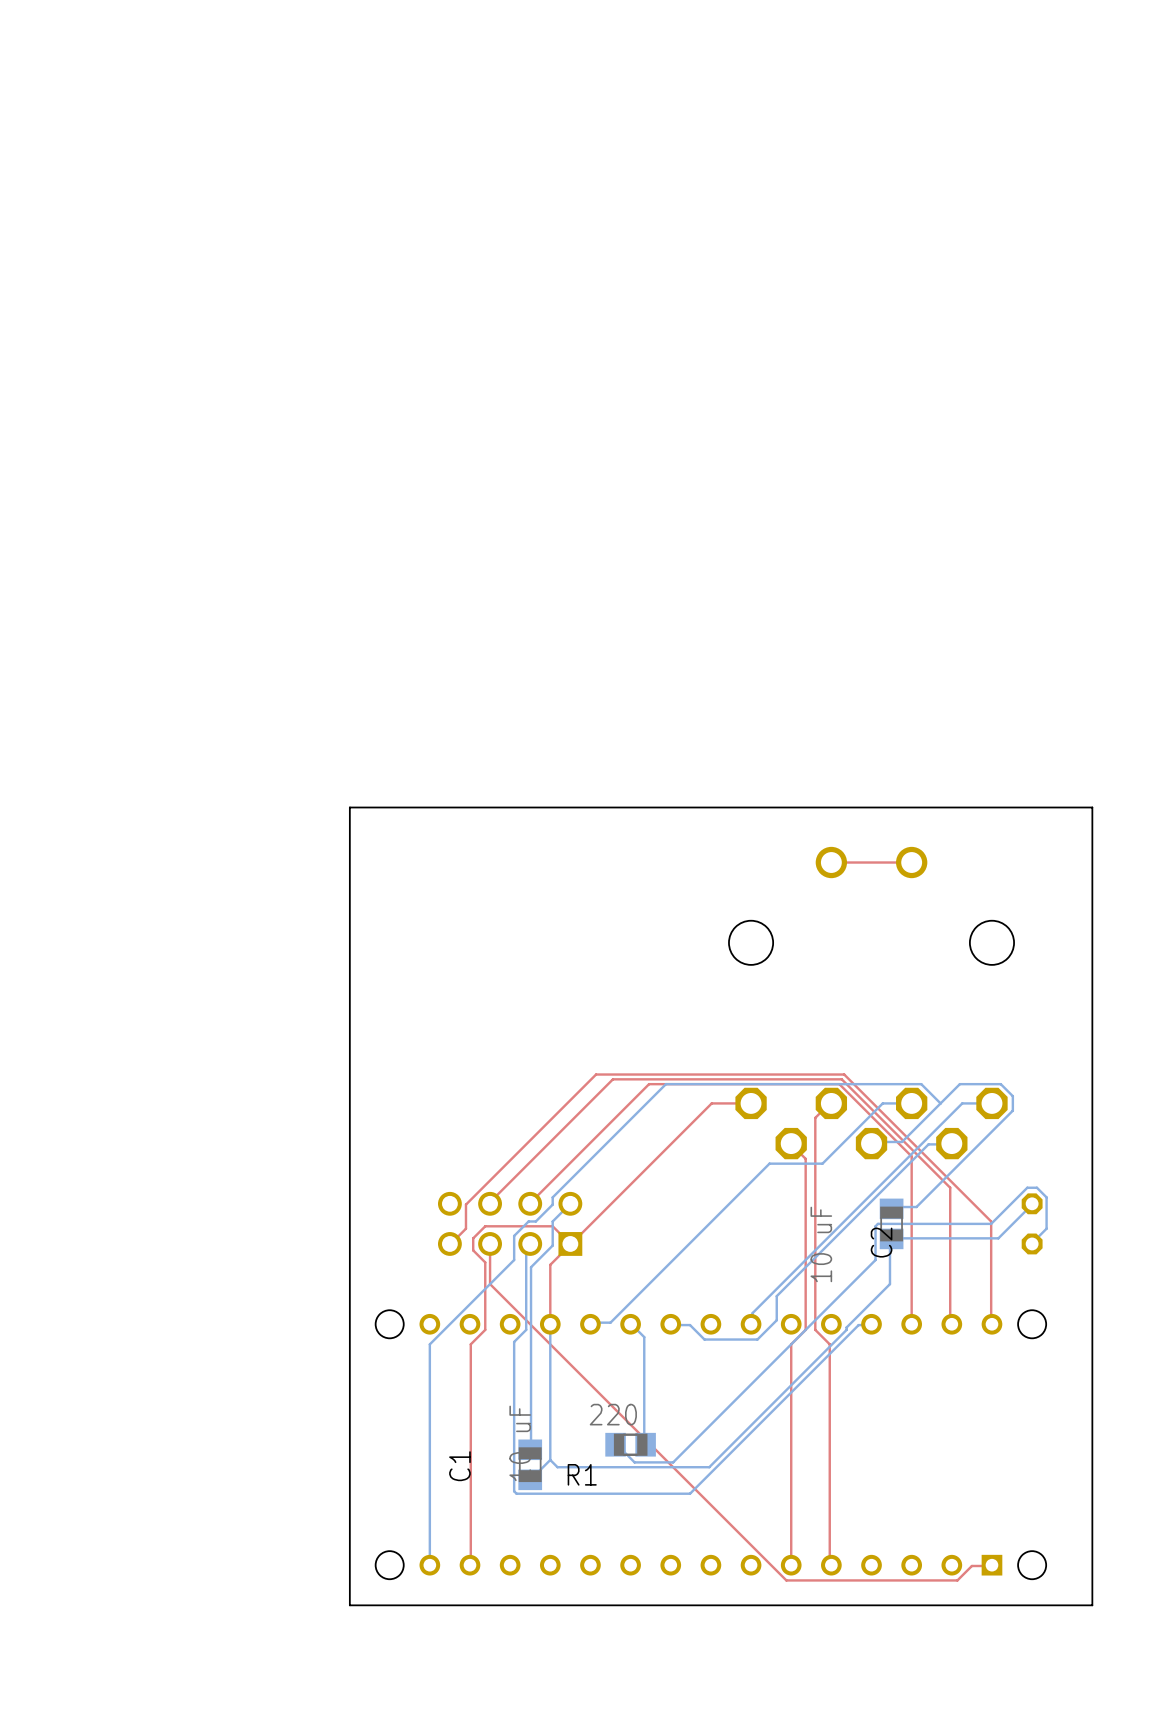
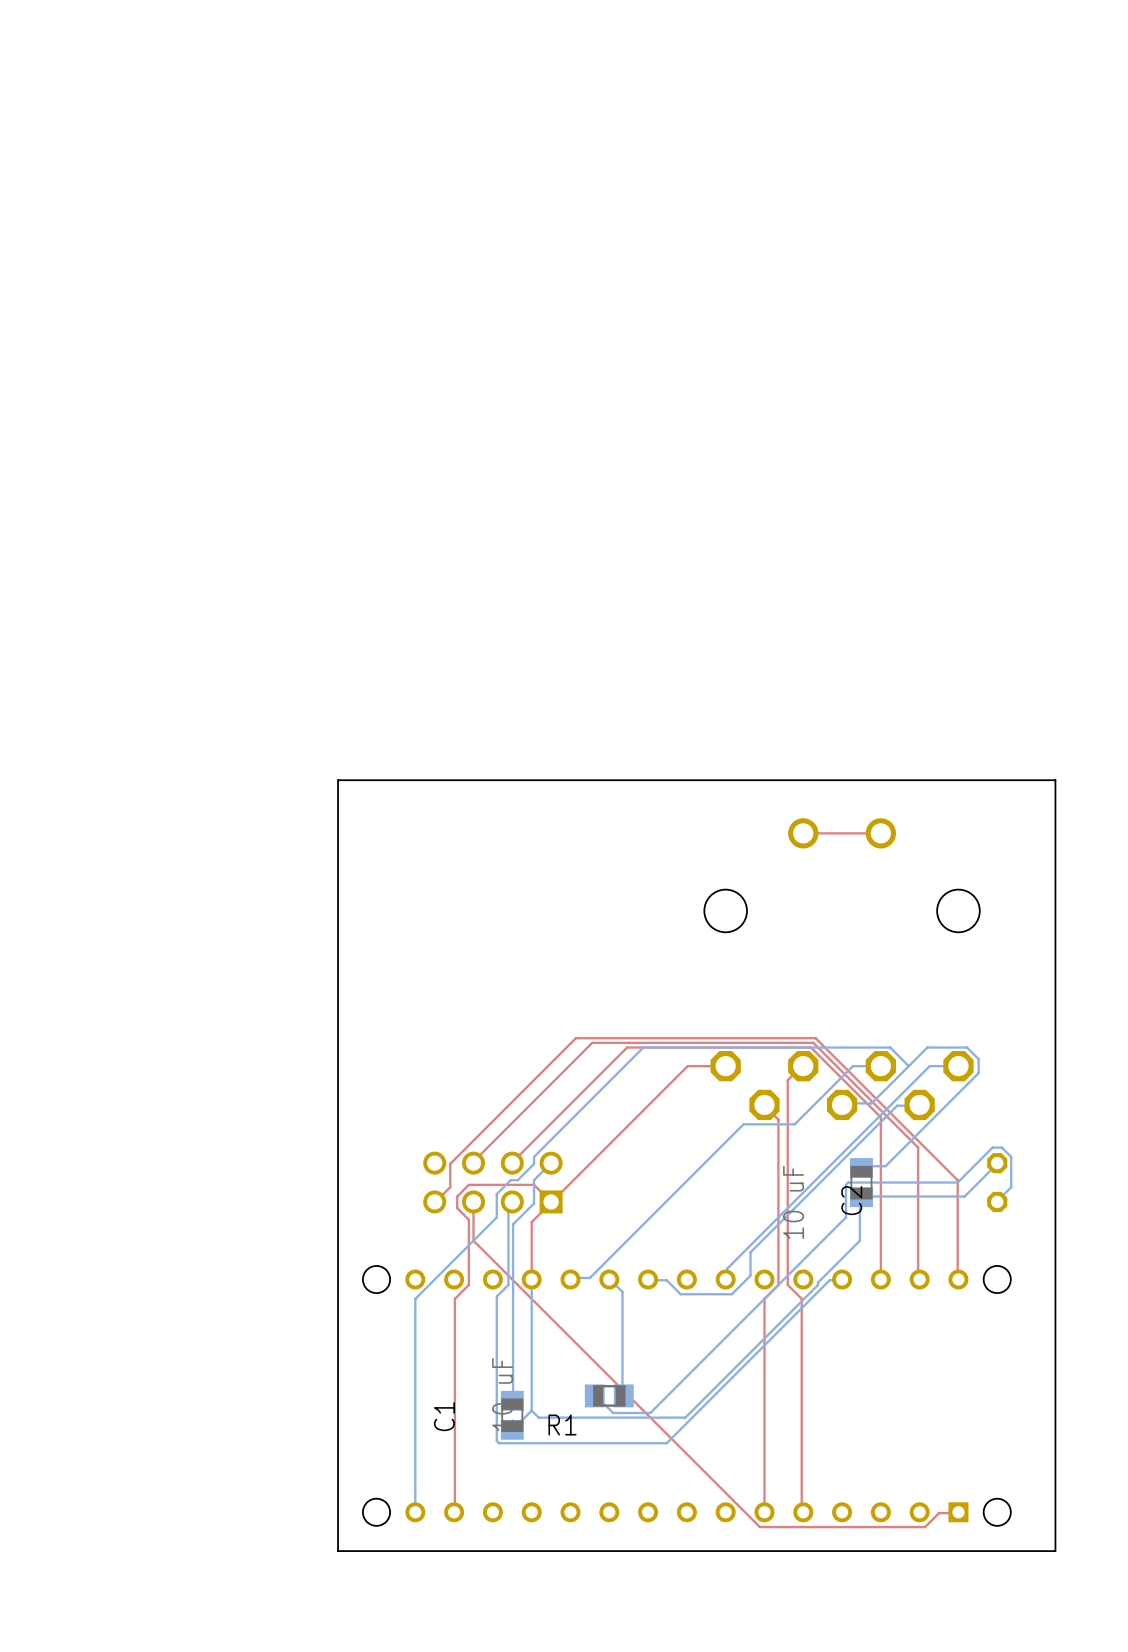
R1 value: 220 (613, 1414) -> none

